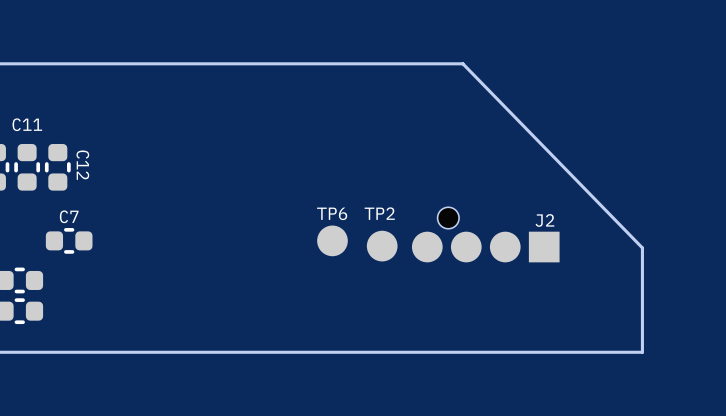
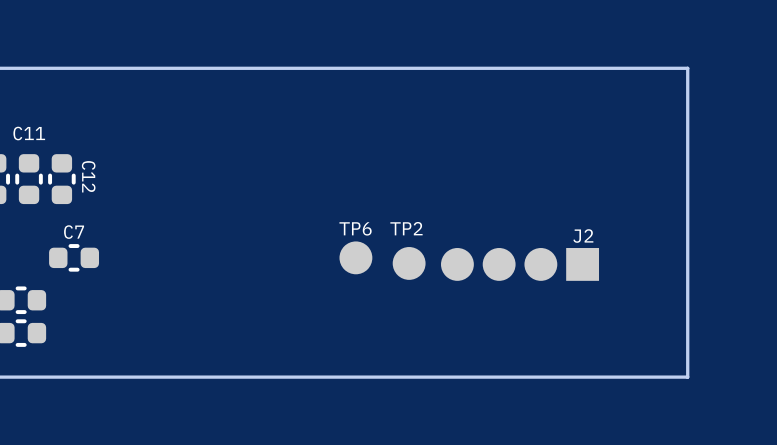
board edge: (462, 63) (642, 247) -> (495, 68) (687, 68) (687, 265)
part: (448, 218) -> none

